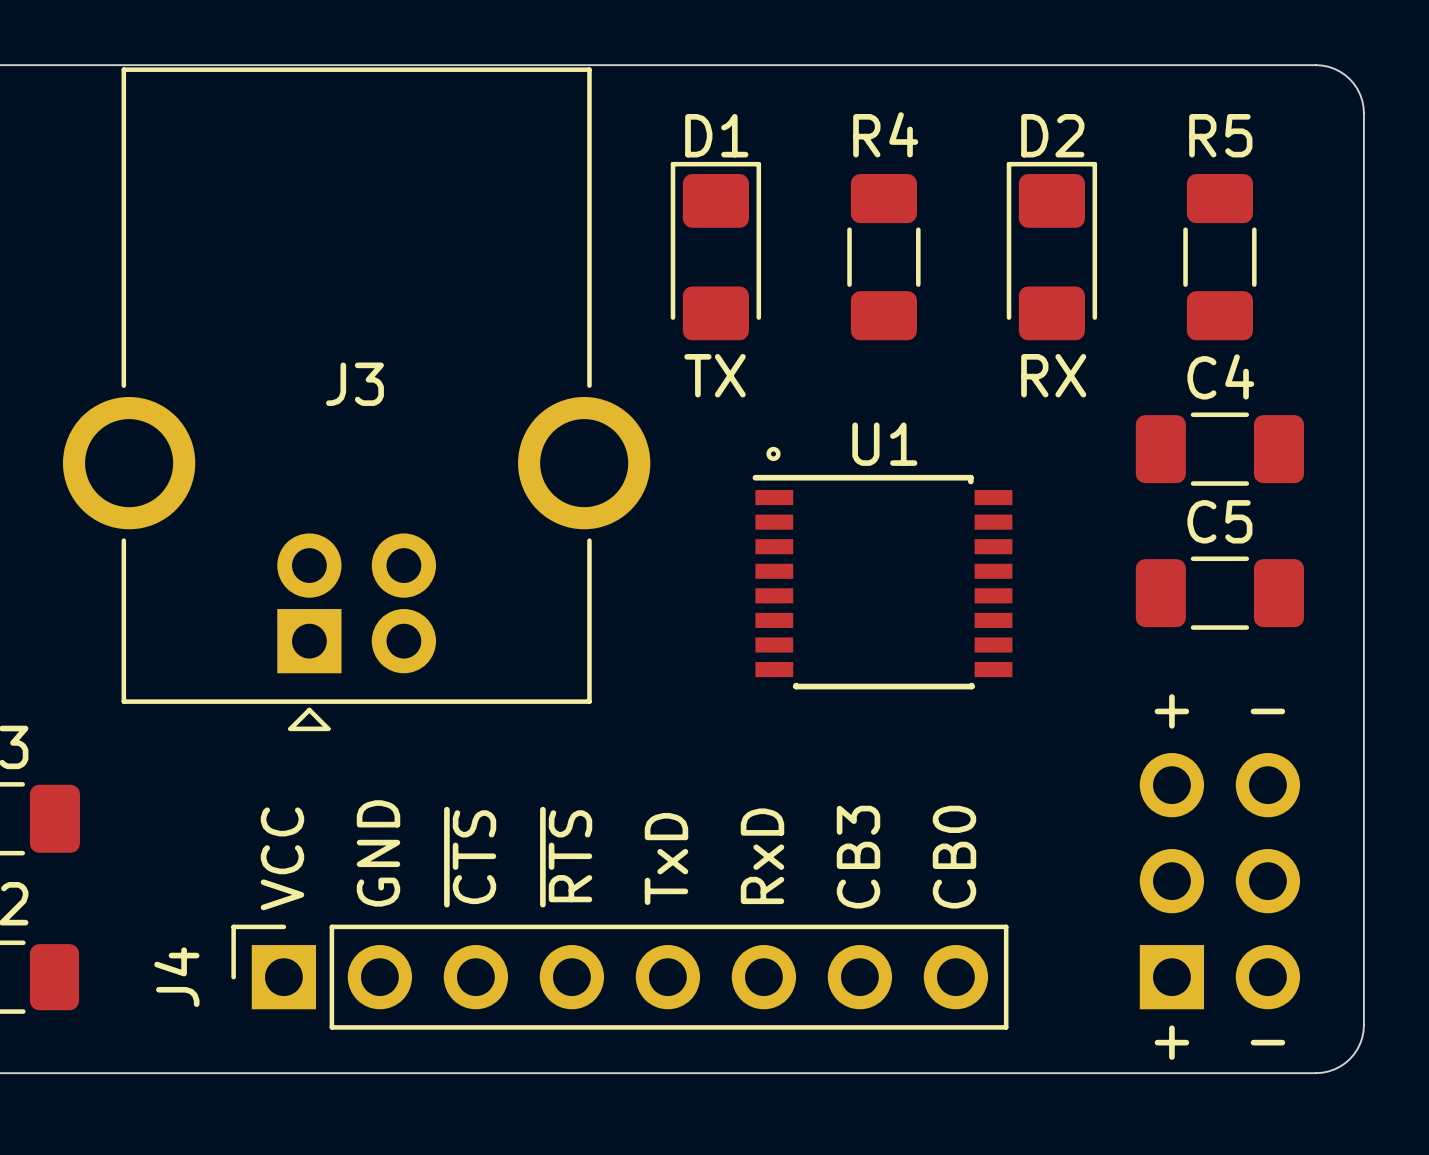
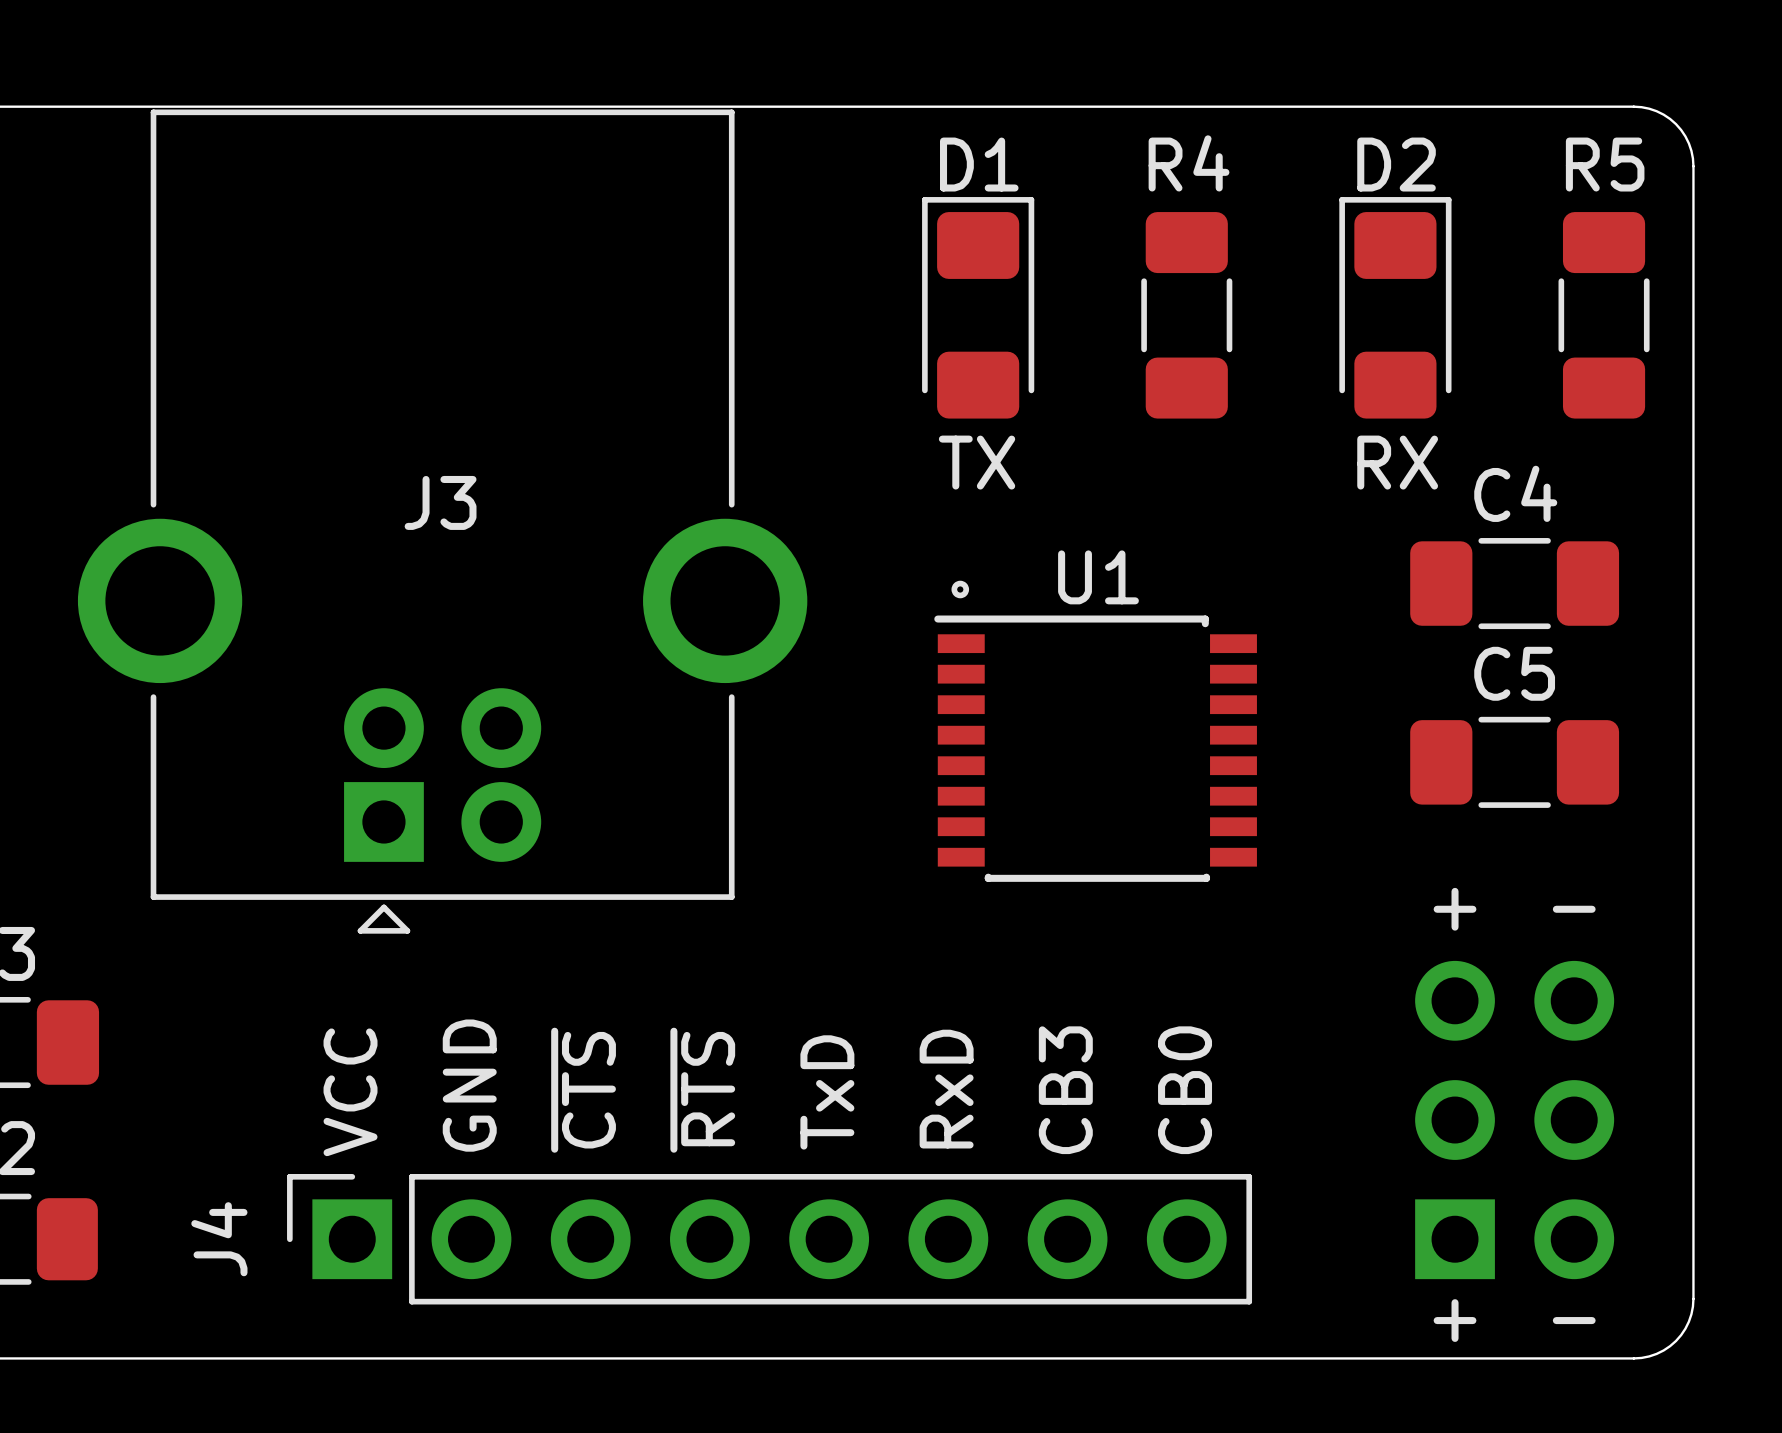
D1 position: (715, 251) -> (978, 307)
D2 position: (1051, 251) -> (1395, 307)
R4 position: (883, 257) -> (1186, 315)
R5 position: (1219, 257) -> (1604, 315)
text position: TX (715, 375) -> TX (977, 462)
text position: RX (1053, 375) -> RX (1397, 462)

